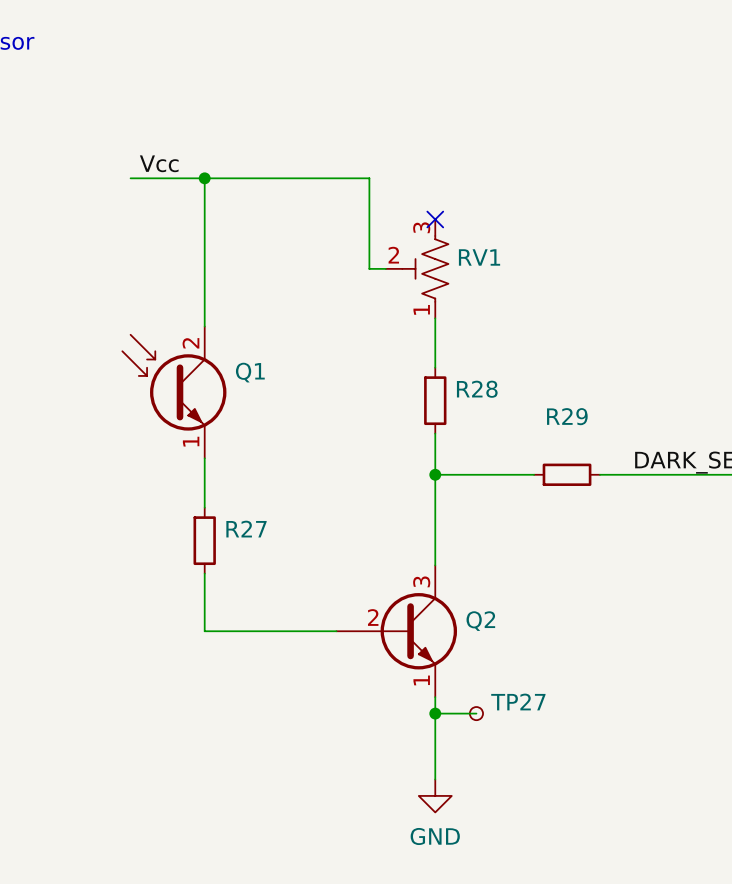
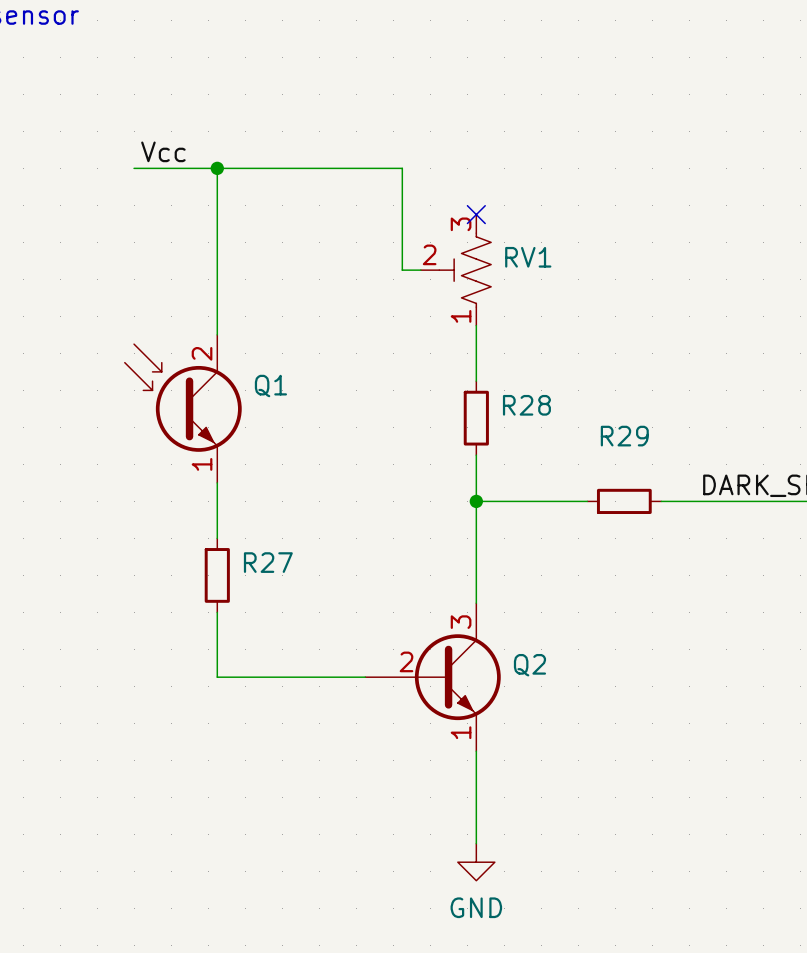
wire: (435, 713) (476, 713) -> none
junction: (435, 713) -> none
TP27: (476, 713) -> none

